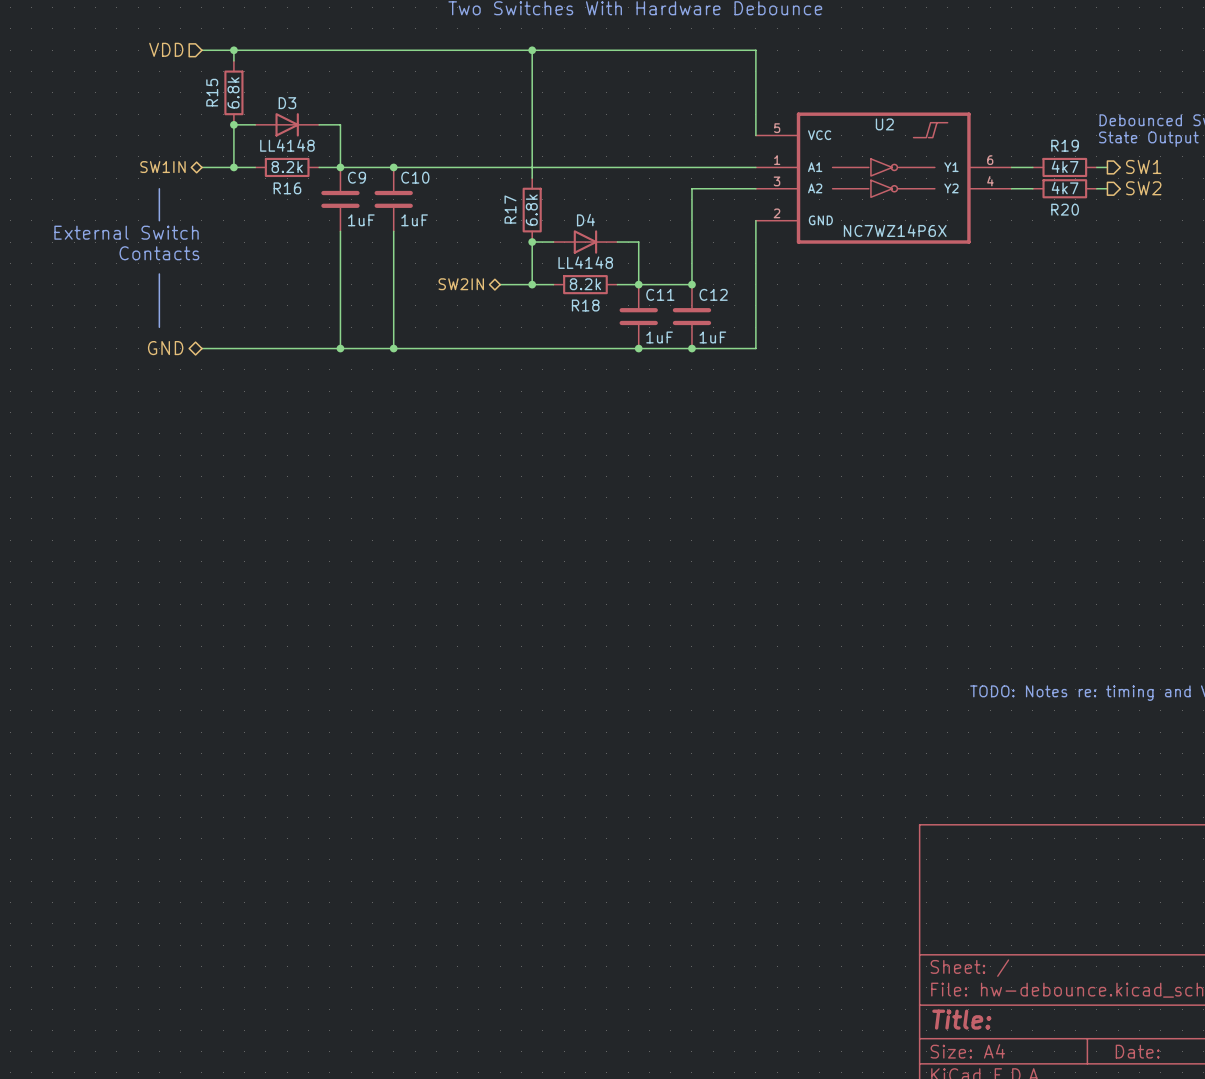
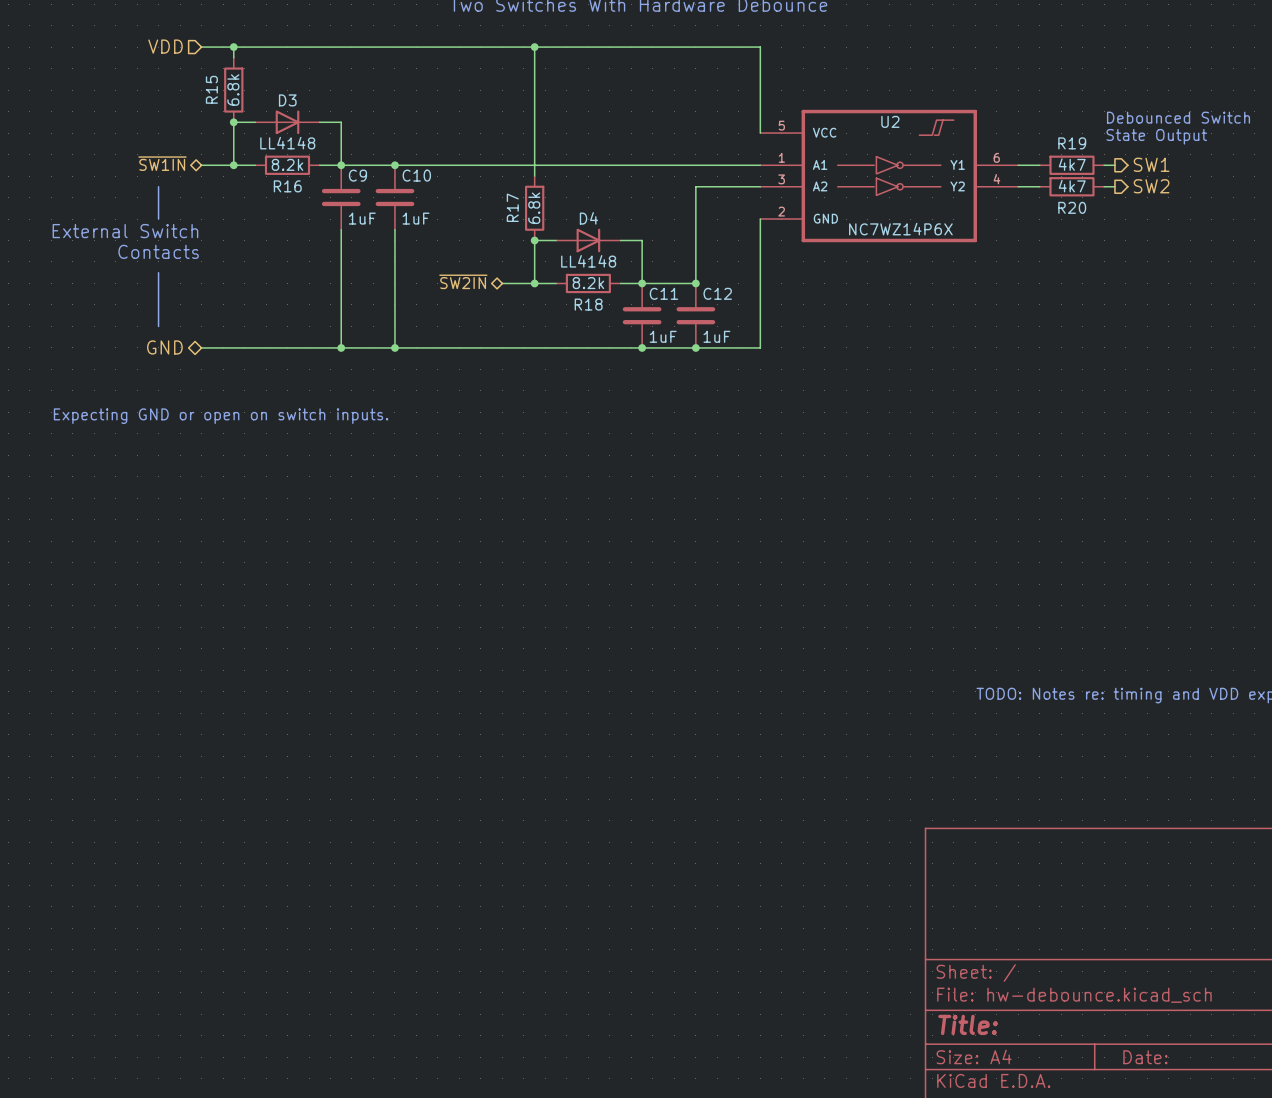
hierarchical label: SW1IN (162, 167) -> ~{SW1IN} (162, 163)
hierarchical label: SW2IN (461, 284) -> ~{SW2IN} (463, 281)
text: none -> Expecting GND or open on switch inputs. (221, 416)

